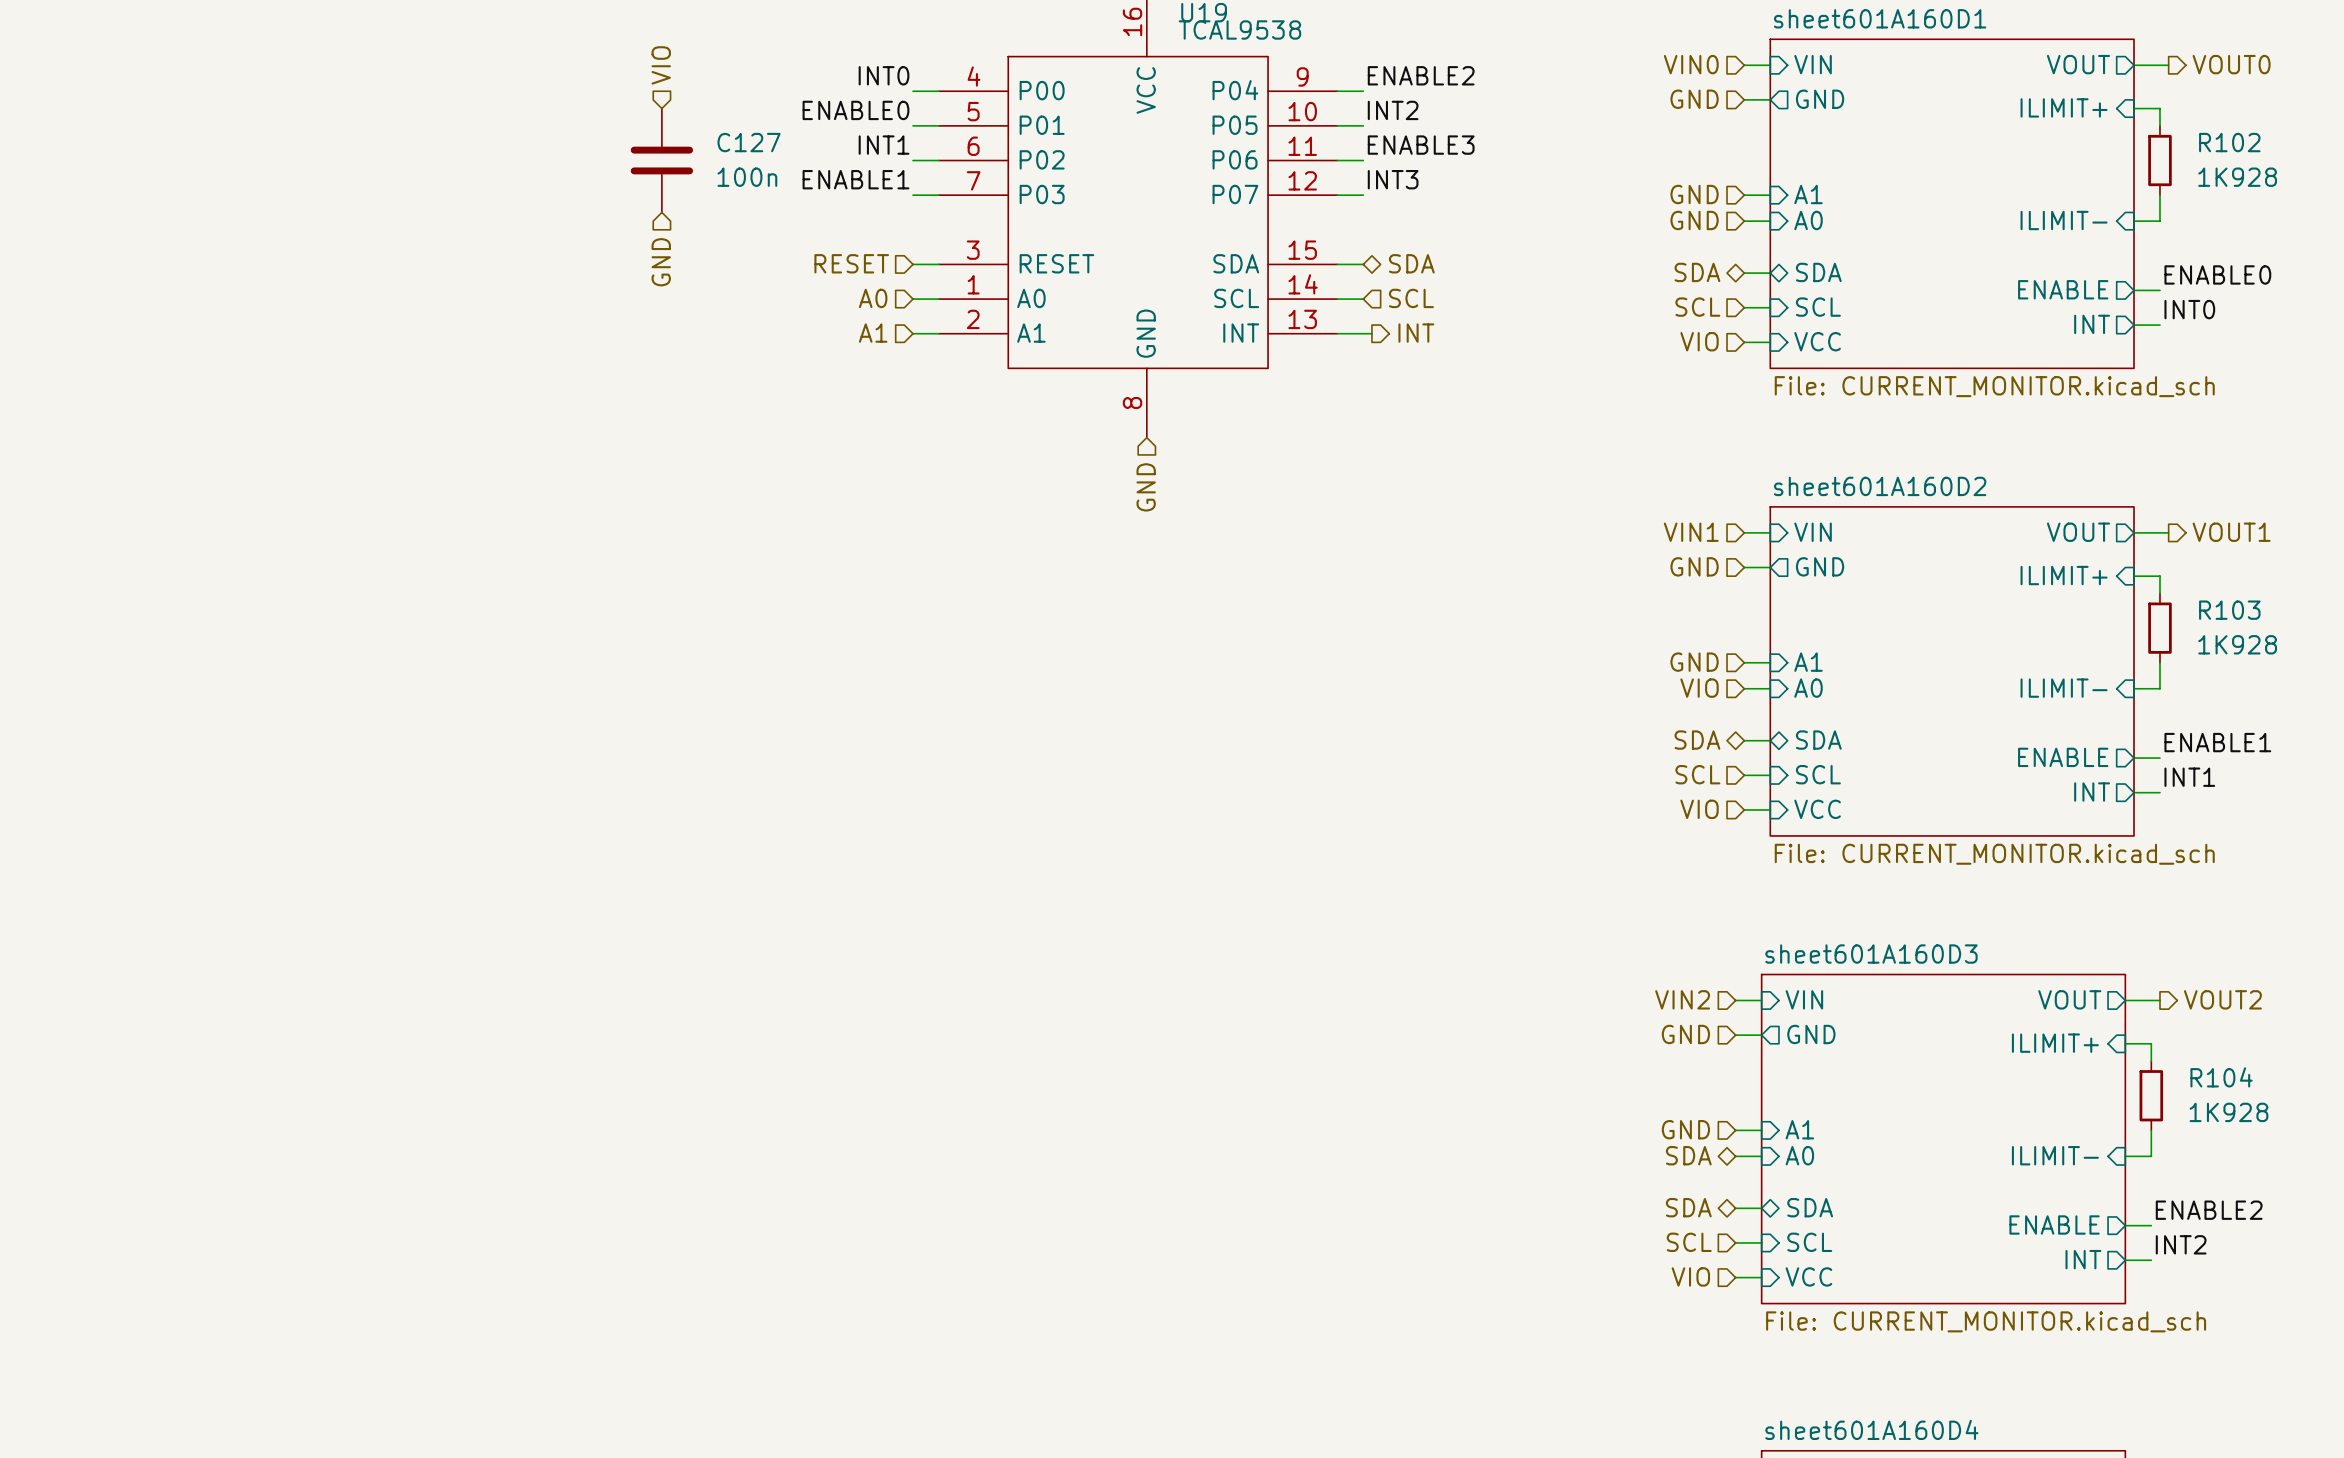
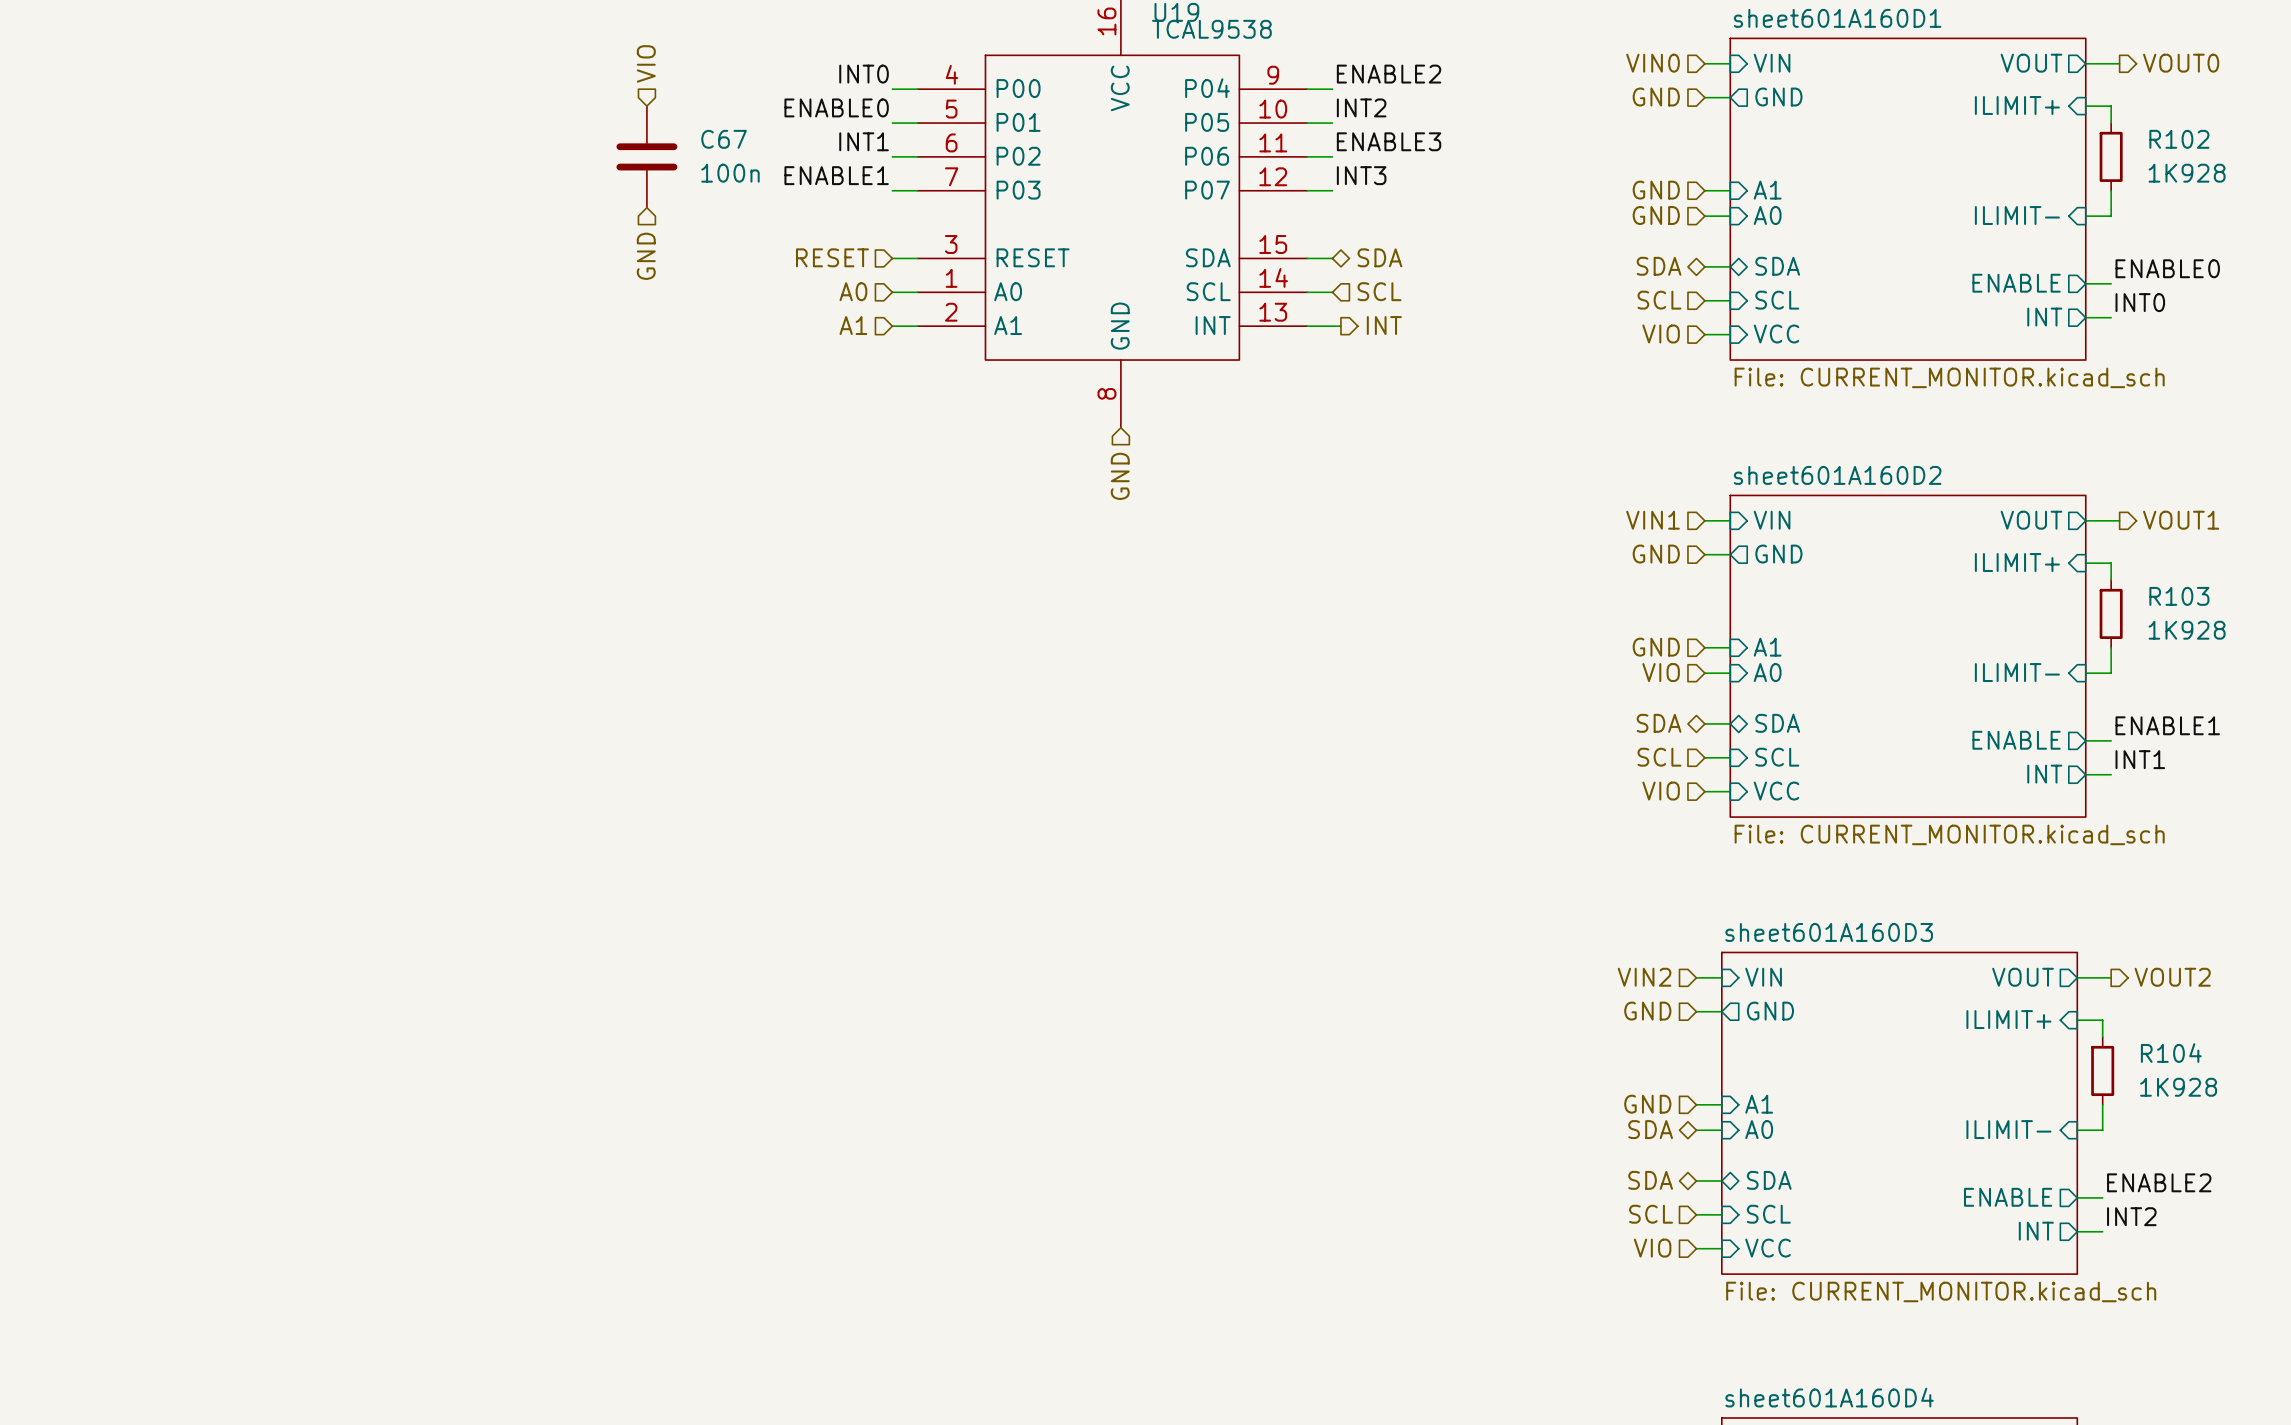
C127 name: C127 (749, 142) -> C67 (724, 139)

